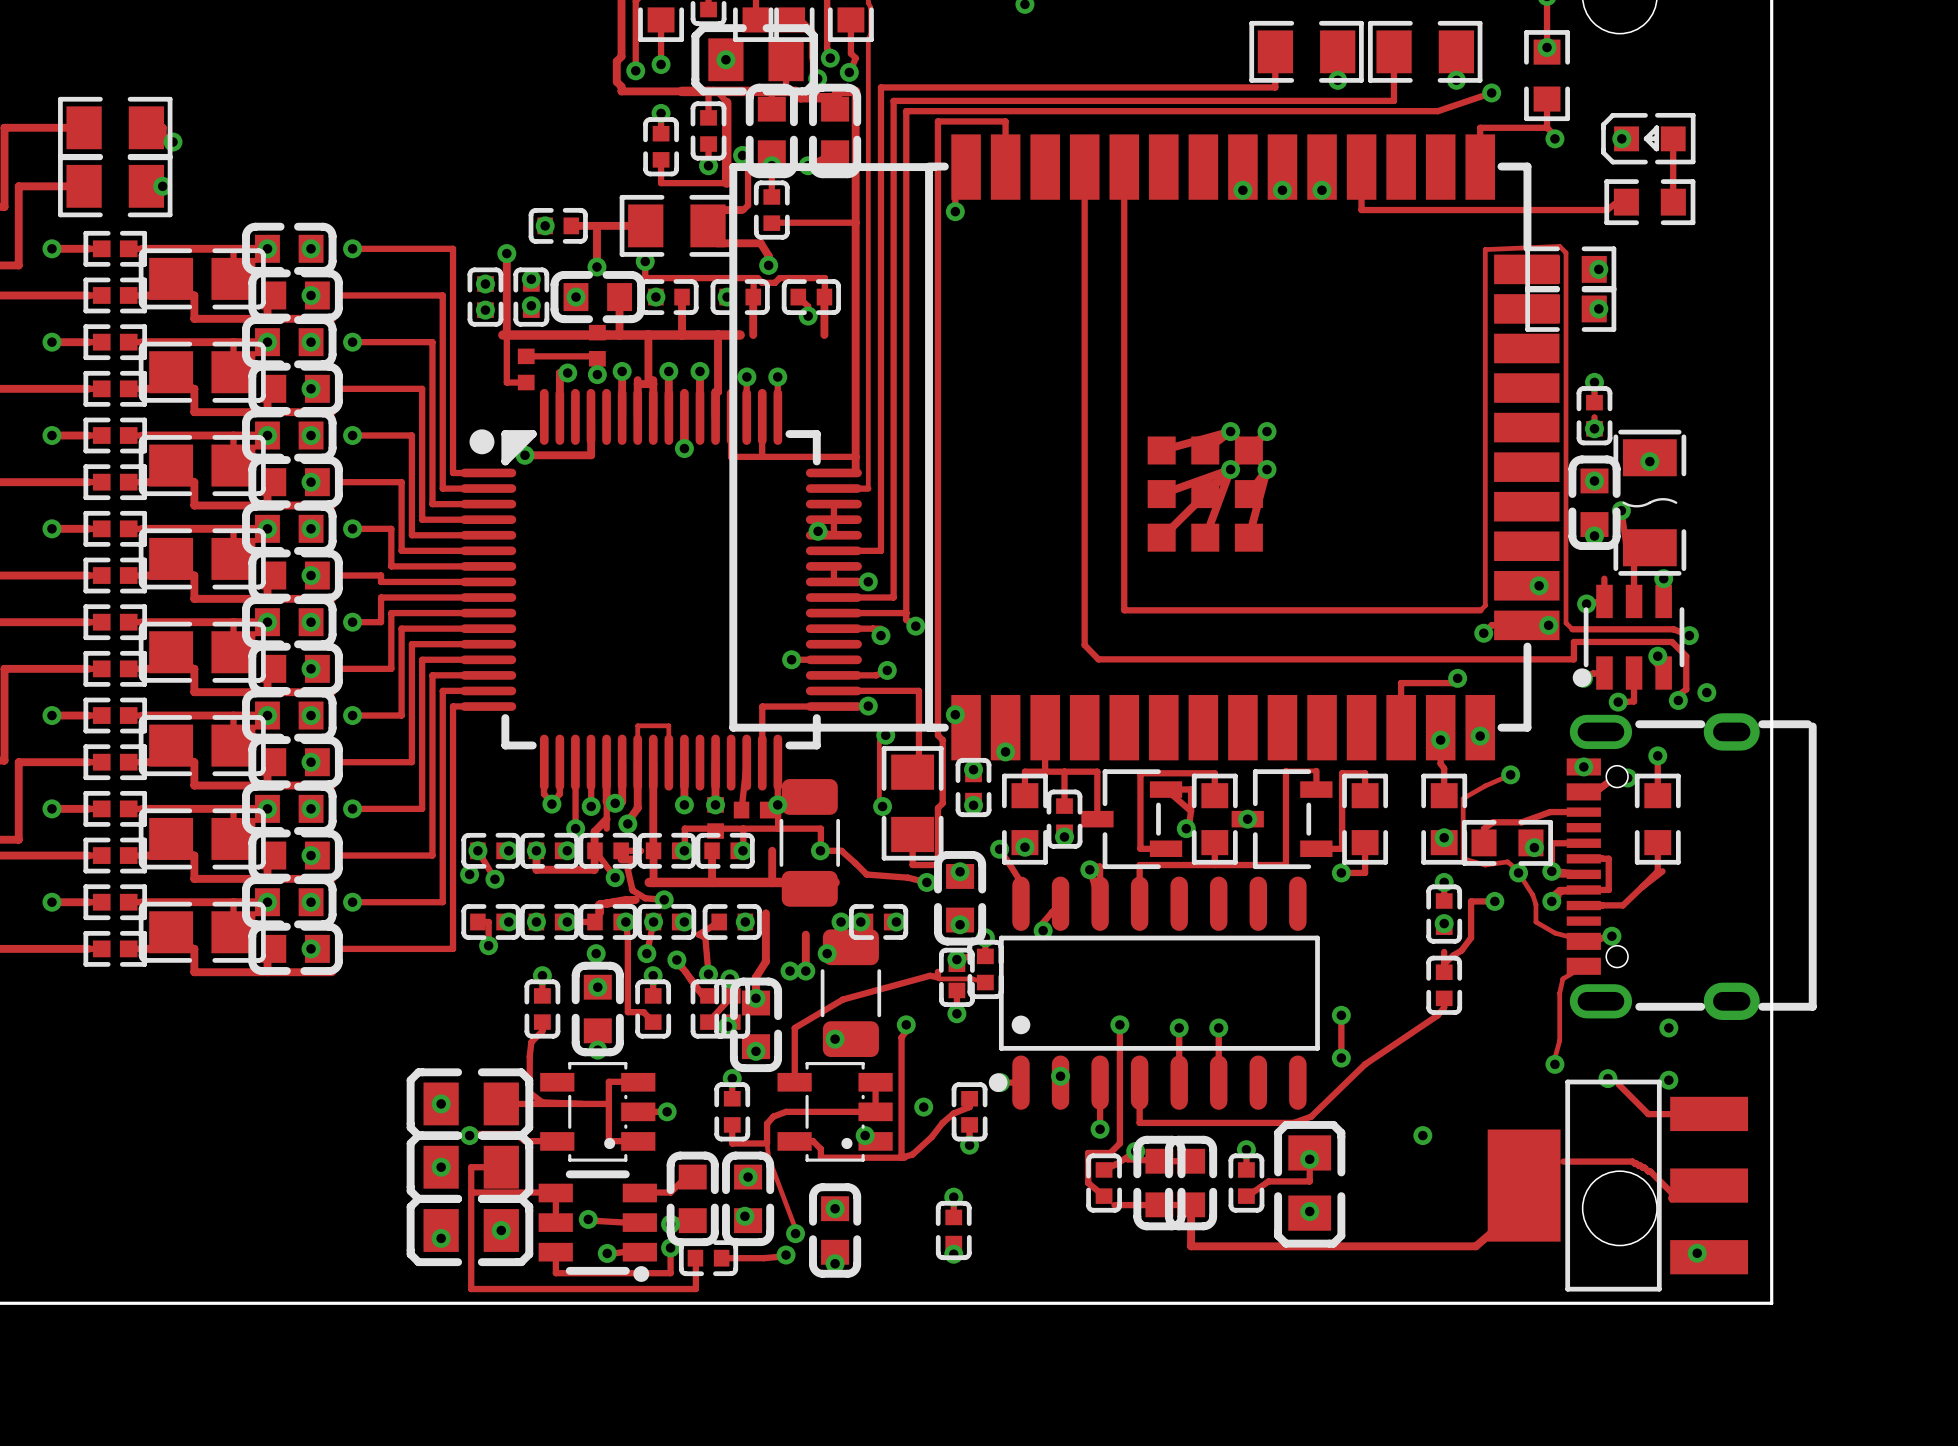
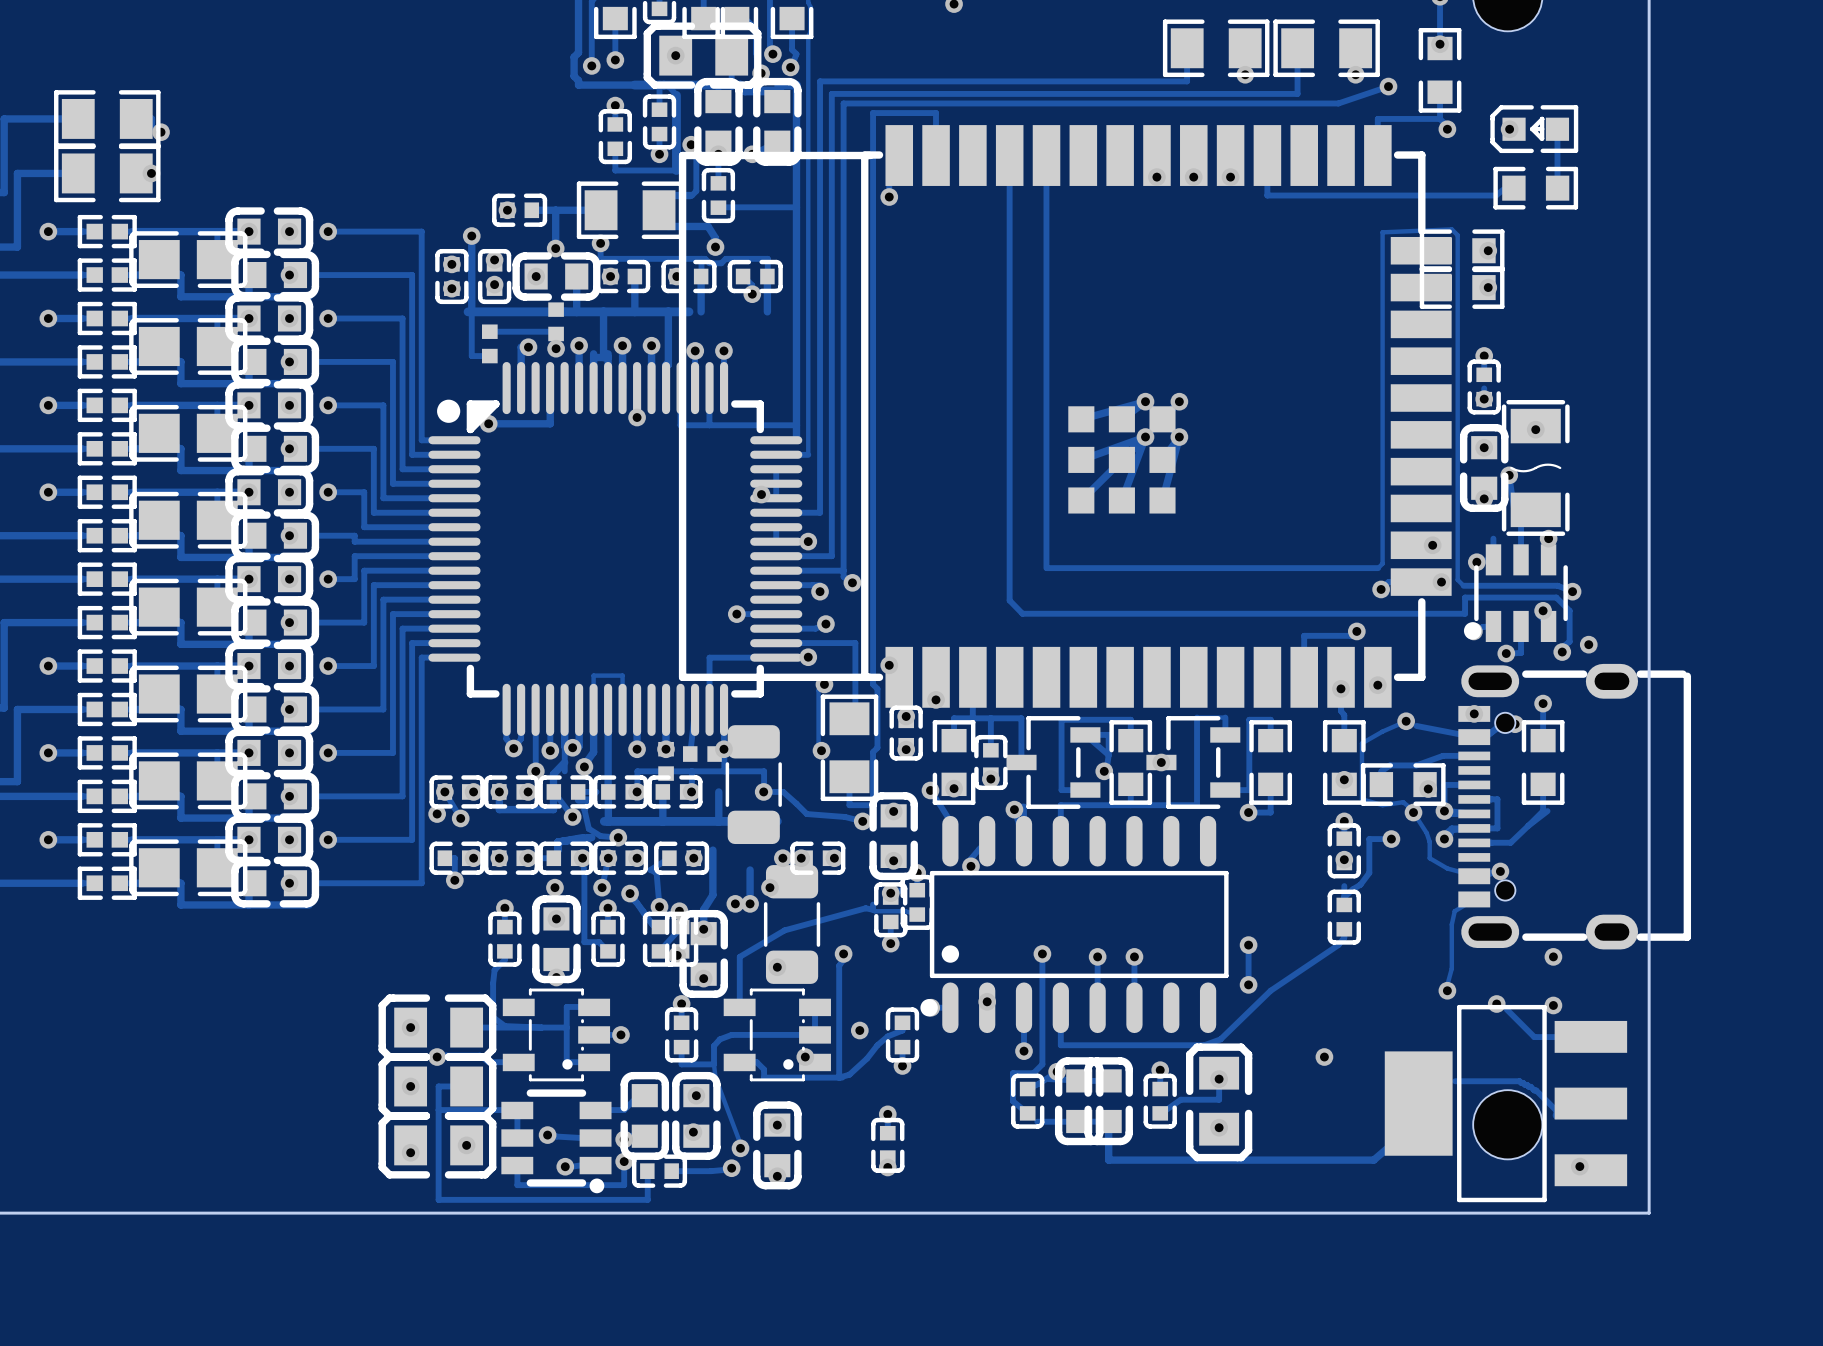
track: none -> (1416, 725) (1474, 737)

